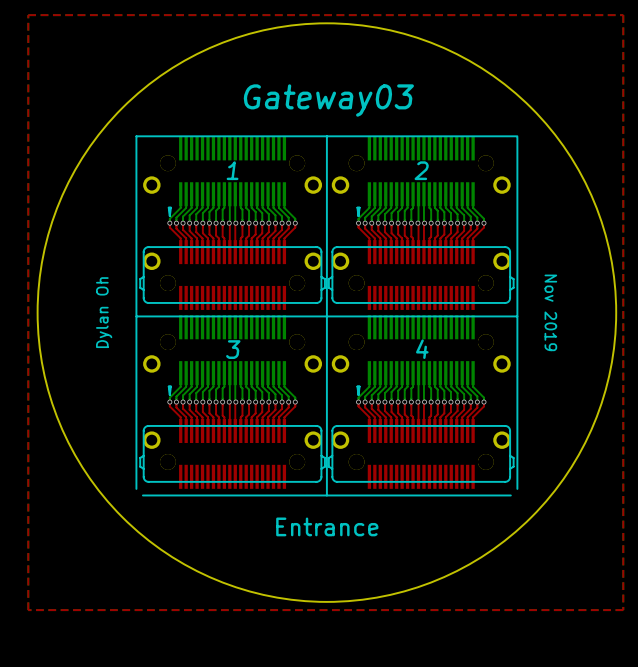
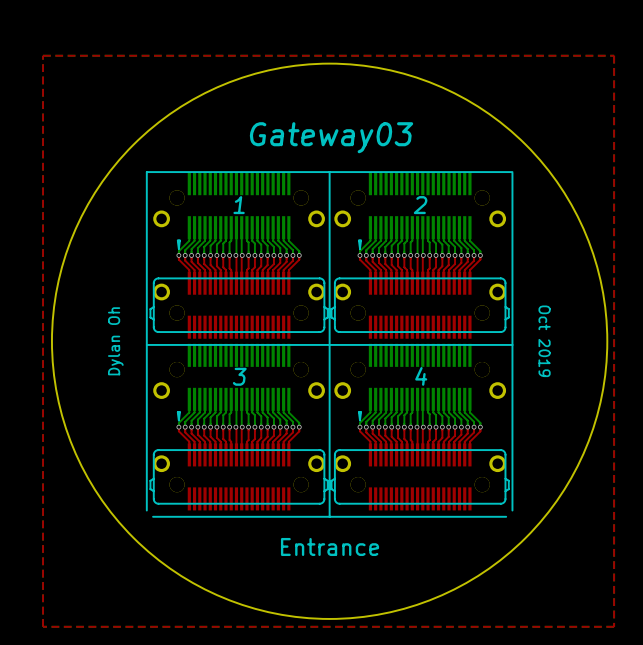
text: Nov 2019 (550, 312) -> Oct 2019 (544, 341)

